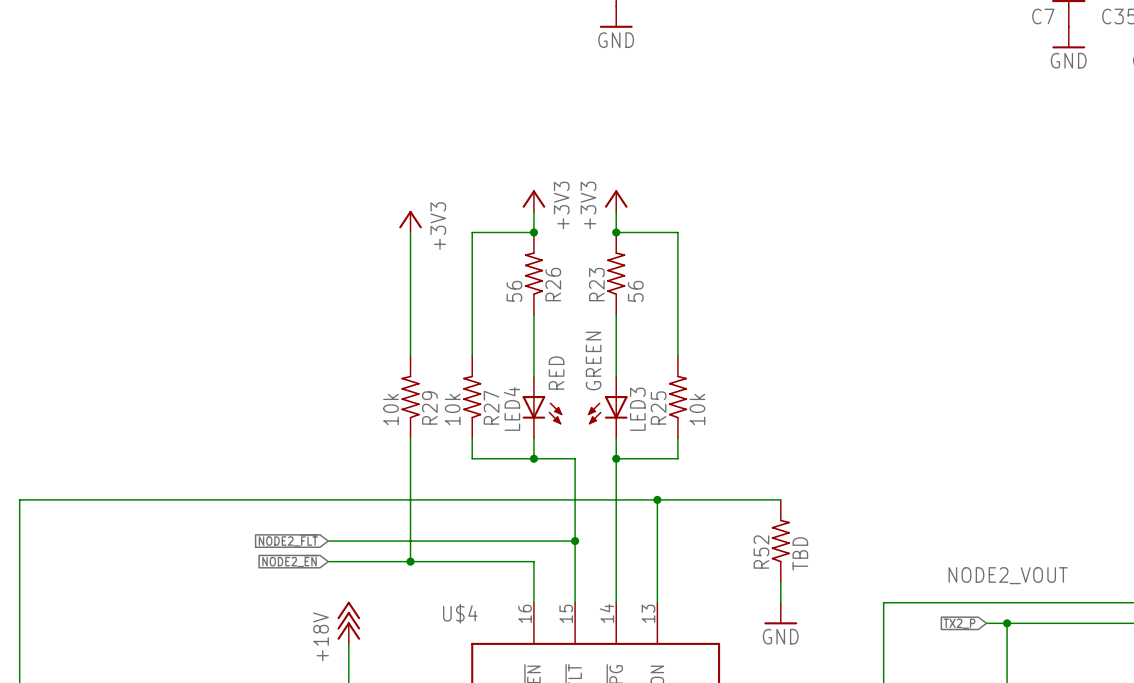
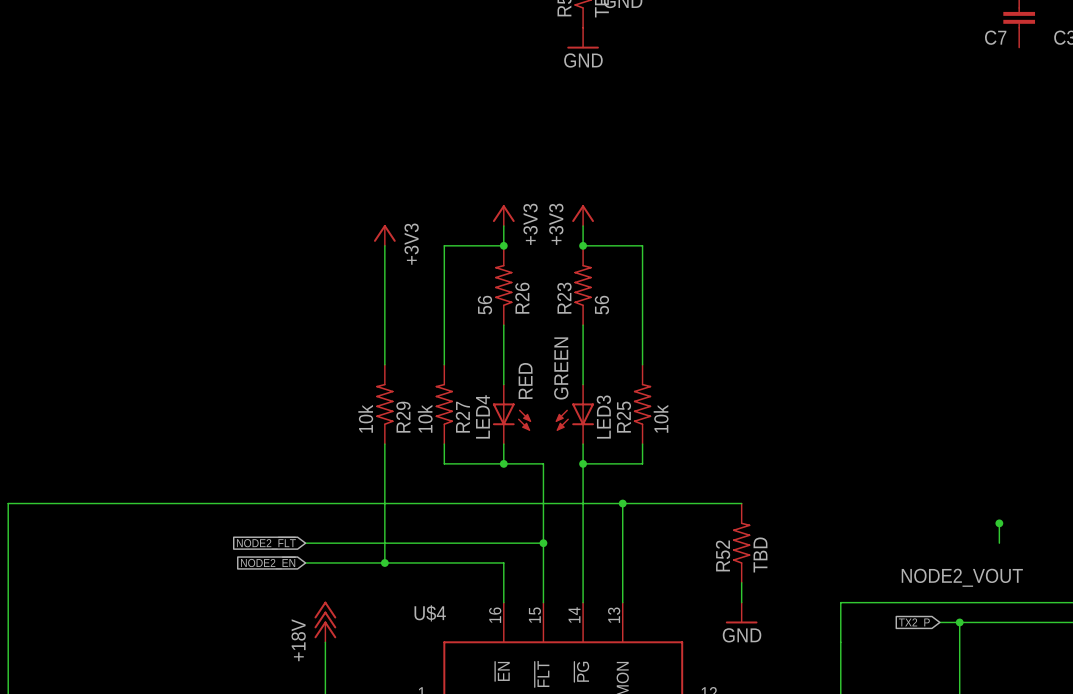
power symbol: GND (1068, 37) -> none
wire: none -> (999, 523) (999, 543)
junction: none -> (999, 523)

